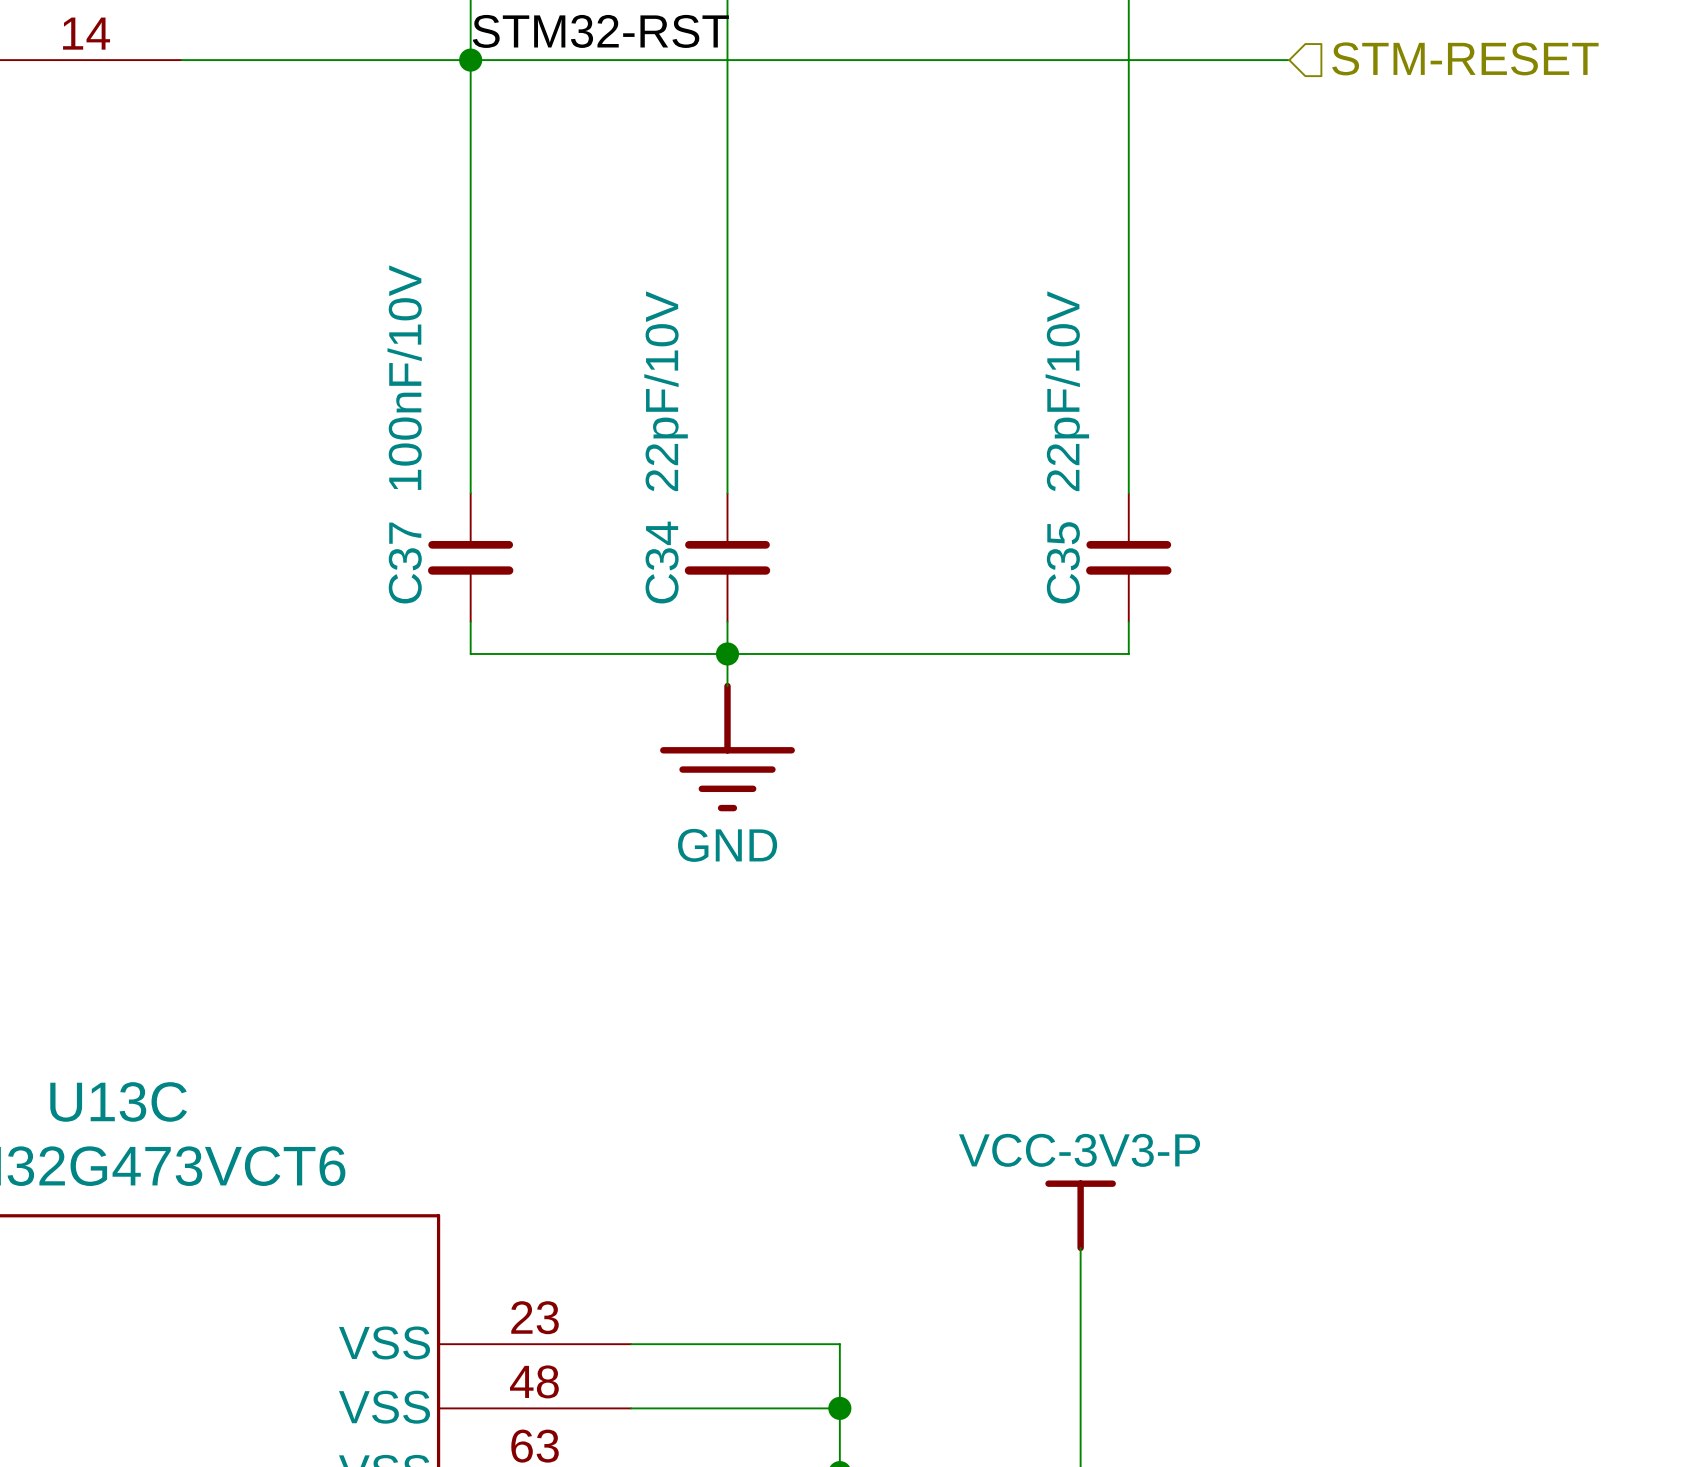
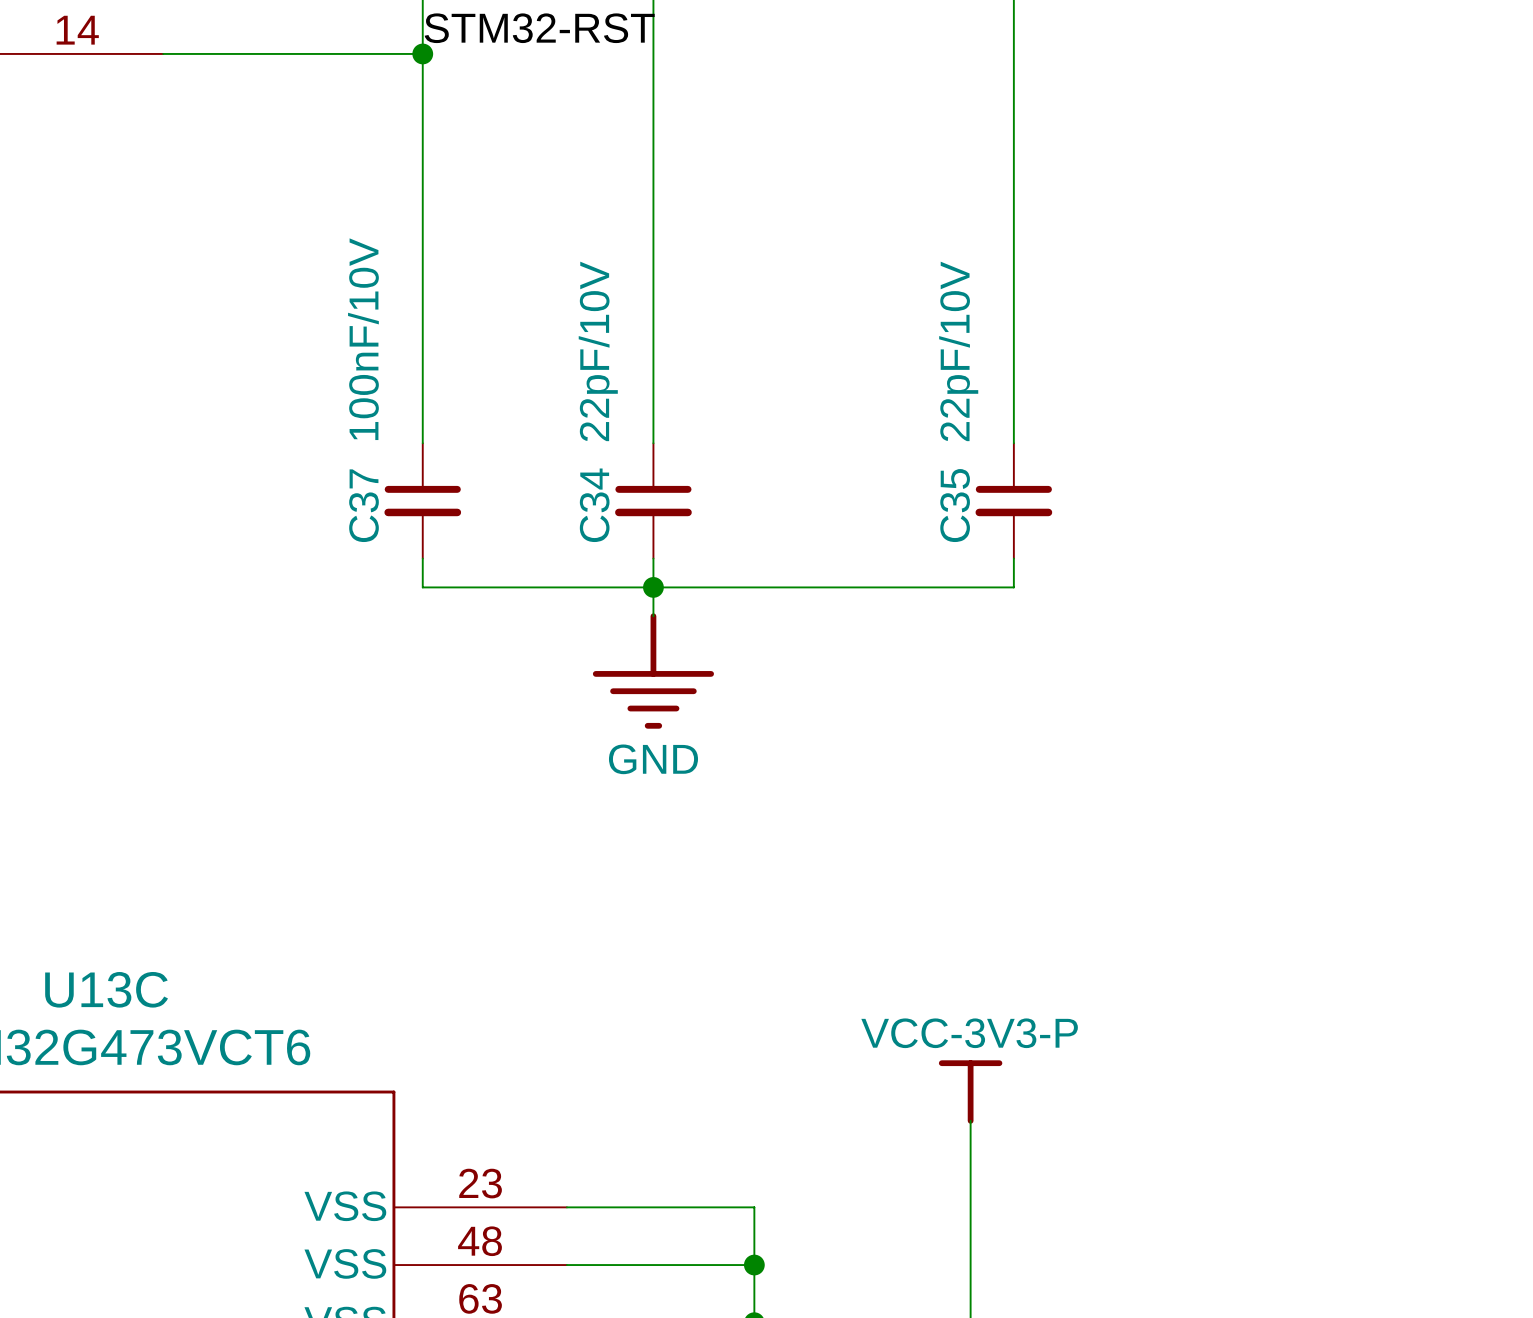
hierarchical label: STM-RESET (1465, 58) -> none
wire: (470, 60) (1289, 60) -> none

